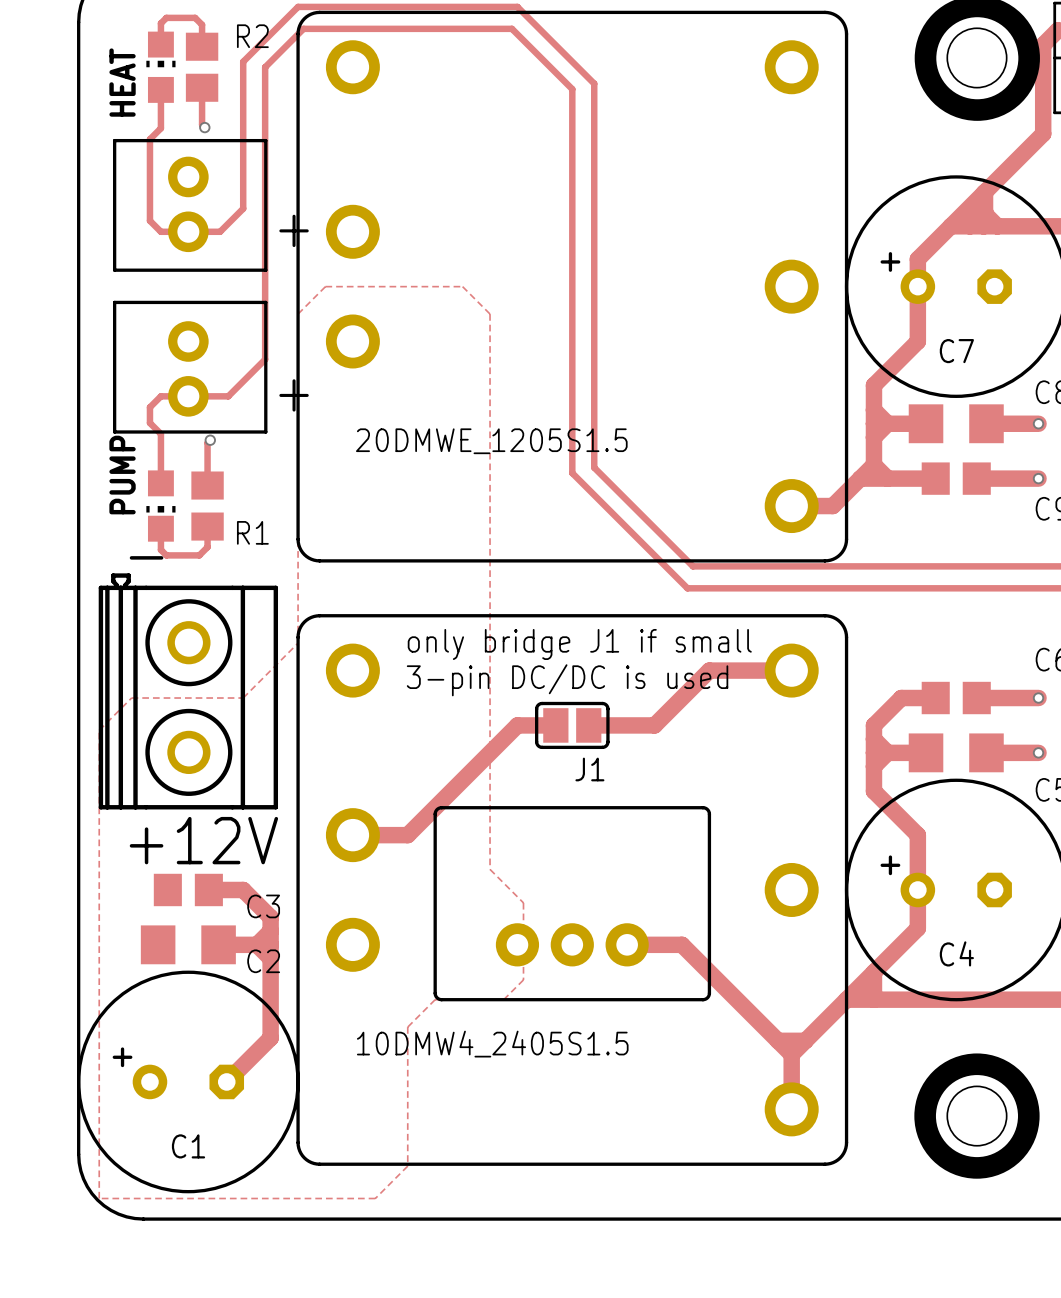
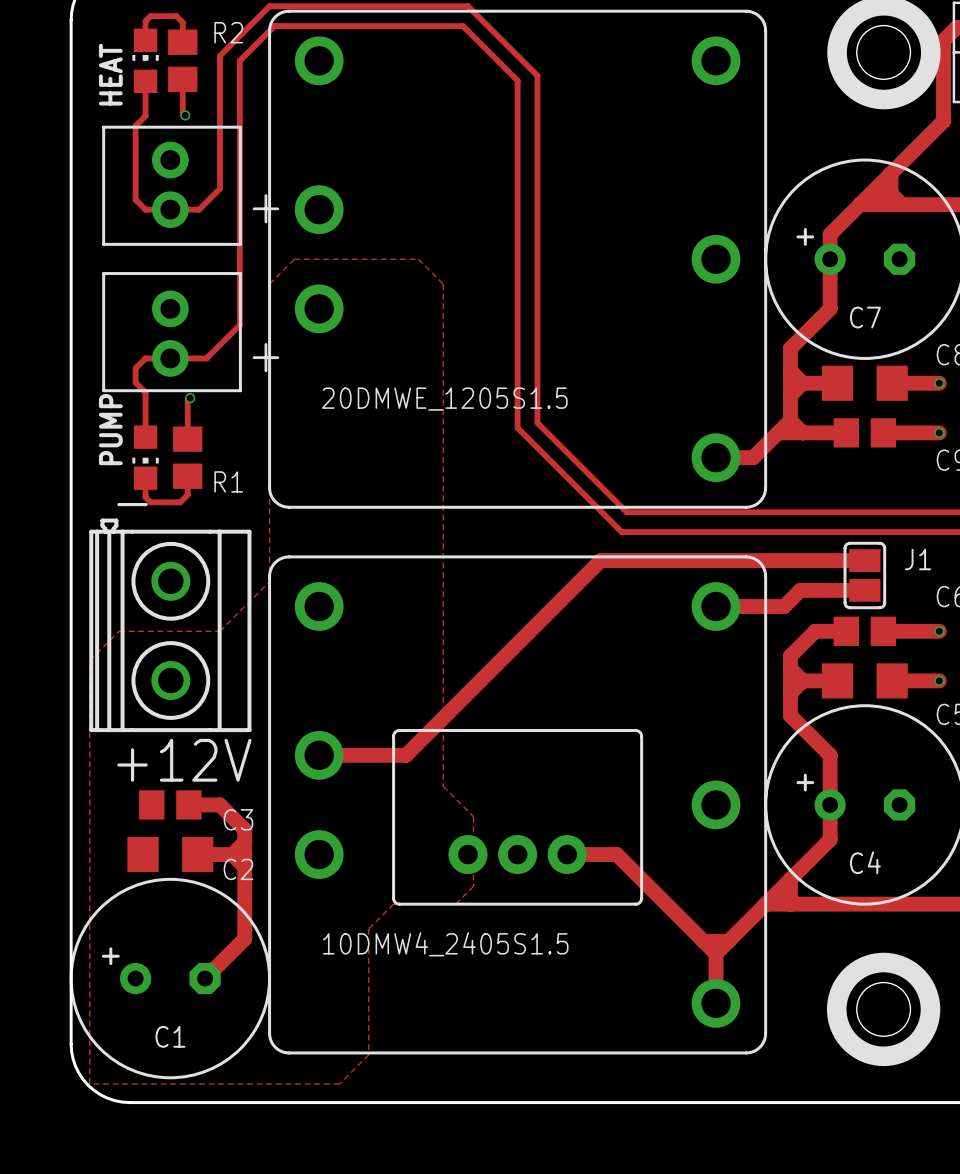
text: only bridge J1 if small (579, 644) -> none
track: (791, 670) (709, 670) (654, 725) (588, 725) -> (716, 606) (784, 606) (800, 590) (864, 590)
text: 3-pin DC/DC is used (567, 680) -> none
track: (555, 725) (517, 725) (407, 835) -> (864, 560) (600, 560) (405, 755) (368, 755)
J1 rotation: 0° (572, 725) -> 90° clockwise (864, 575)
J1 position: (572, 725) -> (864, 575)
J1 name position: J1 (589, 769) -> J1 (918, 559)

